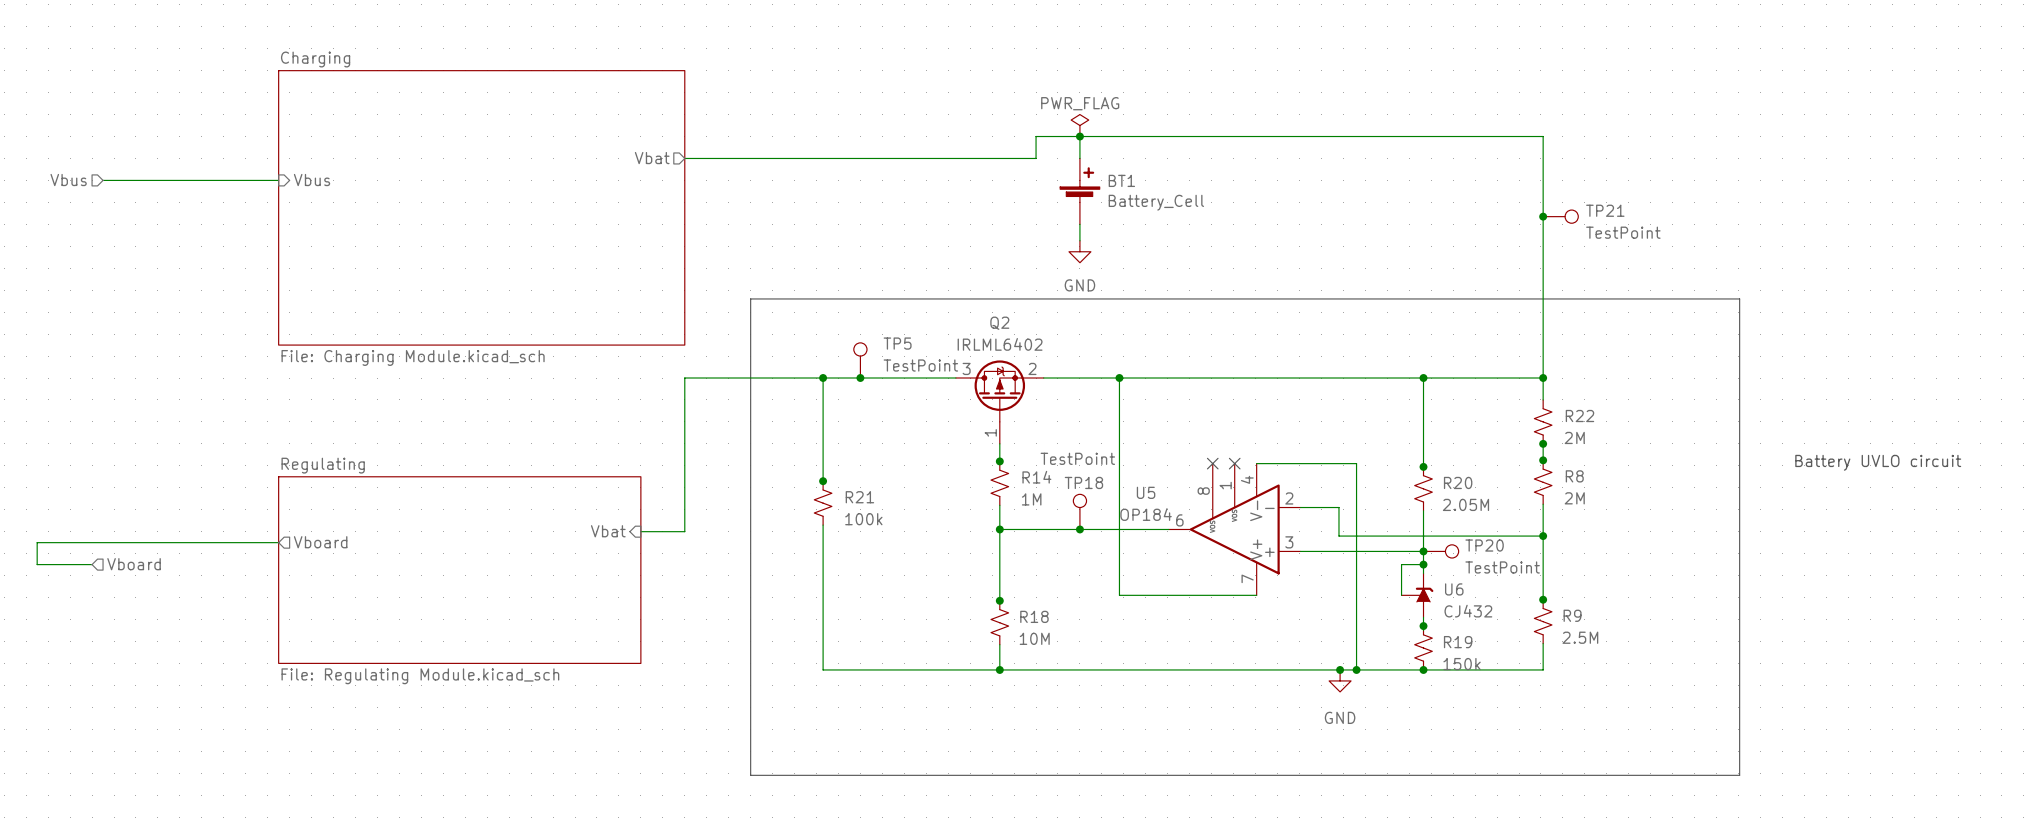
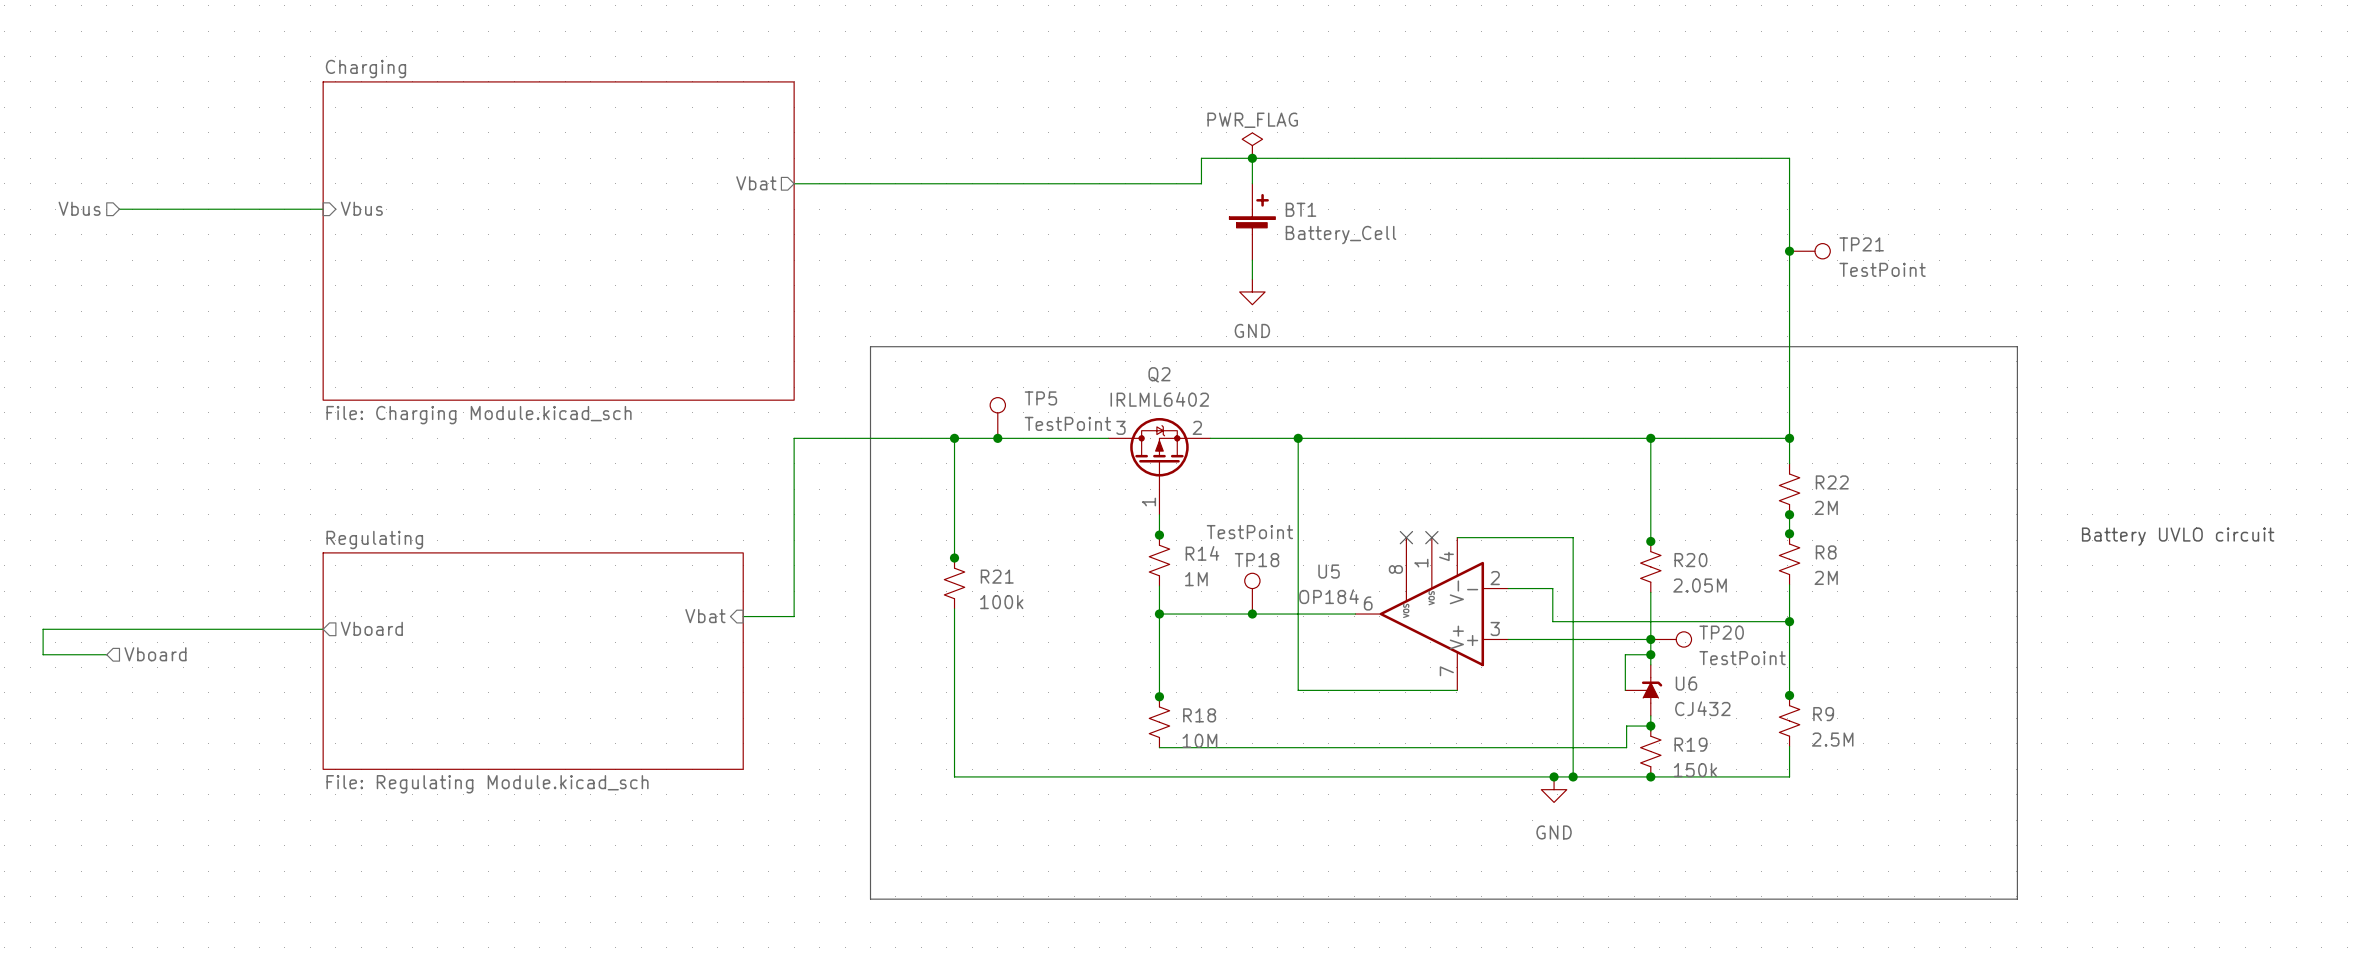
wire: (999, 644) (999, 669) -> (1159, 747) (1626, 747) (1626, 726) (1650, 726)
junction: (999, 669) -> none

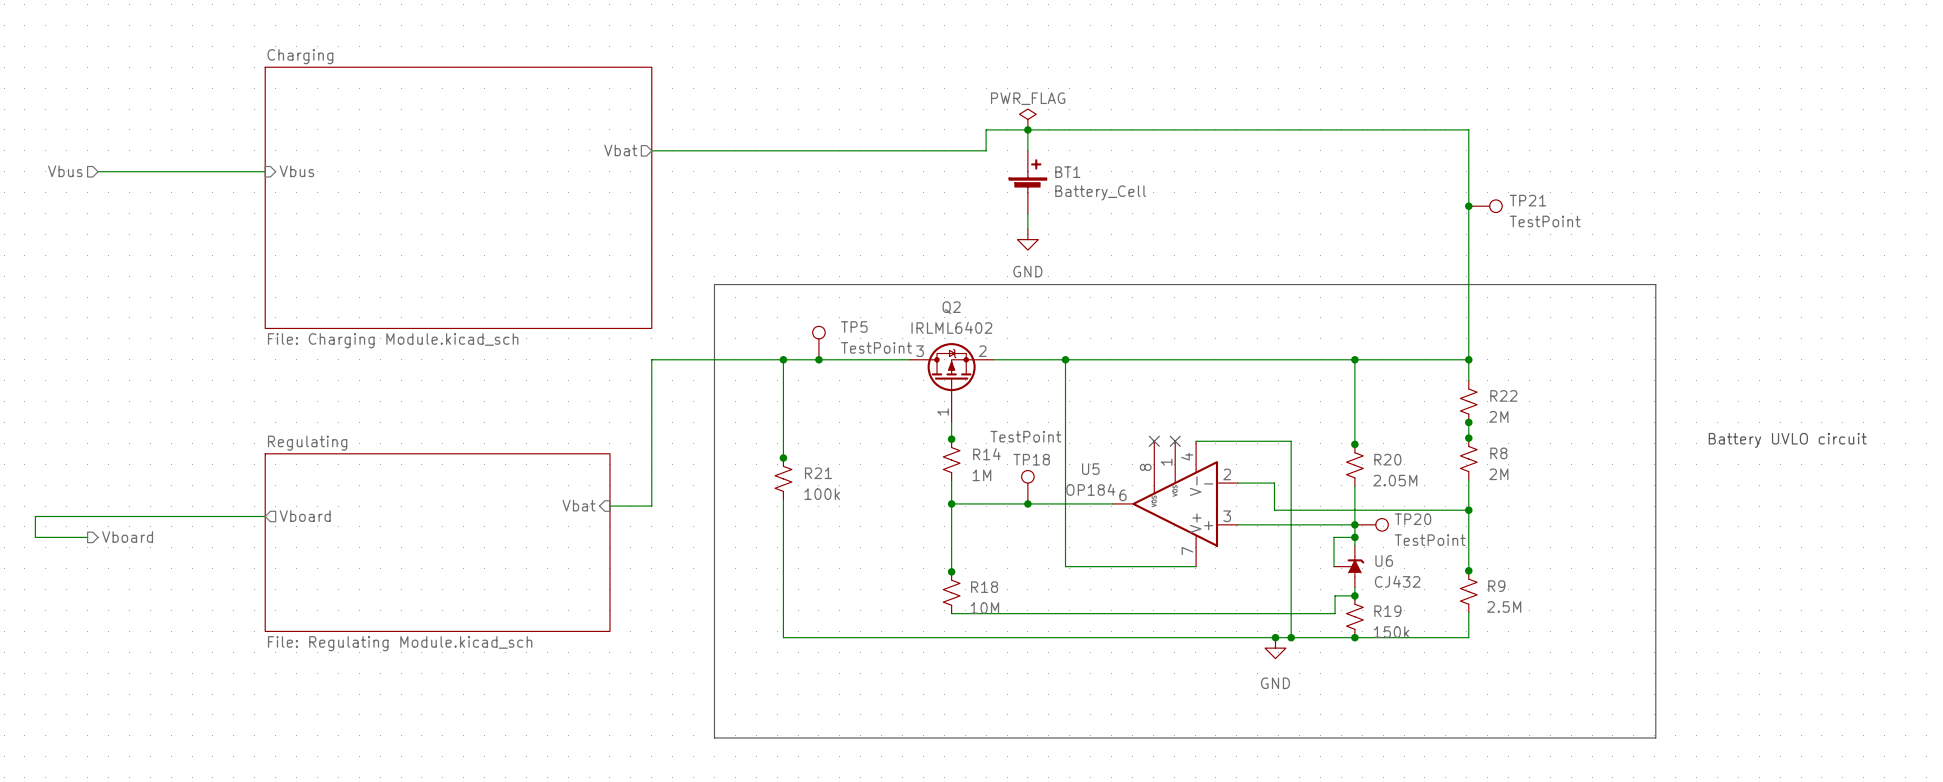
hierarchical label shape: input (155, 654) -> output (127, 537)

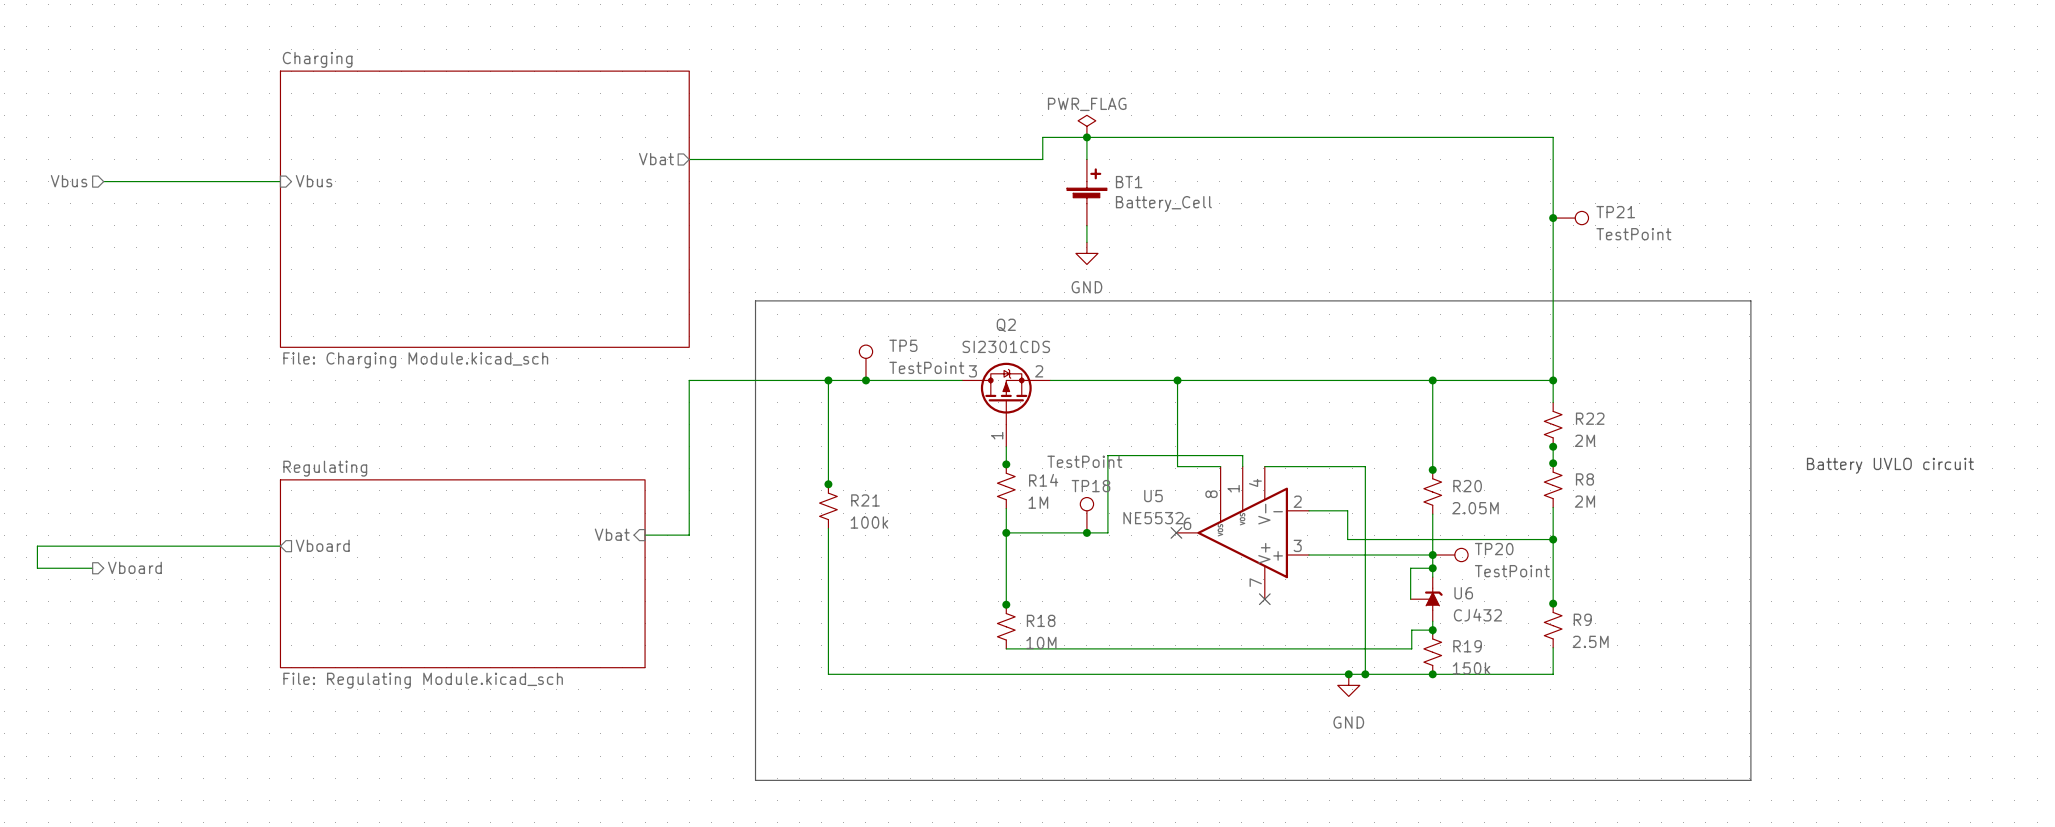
Q2 value: IRLML6402 (951, 327) -> SI2301CDS (1006, 346)
wire: (1065, 359) (1065, 566) (1196, 566) -> none
junction position: (1065, 359) -> (1177, 380)
wire: none -> (1177, 380) (1177, 466) (1220, 466)
no-connect mark: (1154, 441) -> none
no-connect mark: (1175, 441) -> none
U5 value: OP184 (1090, 489) -> NE5532 (1153, 518)
wire: (1047, 503) (1112, 503) -> (1107, 532) (1107, 455) (1242, 455) (1242, 466)
no-connect mark: none -> (1176, 532)
no-connect mark: none -> (1264, 599)

